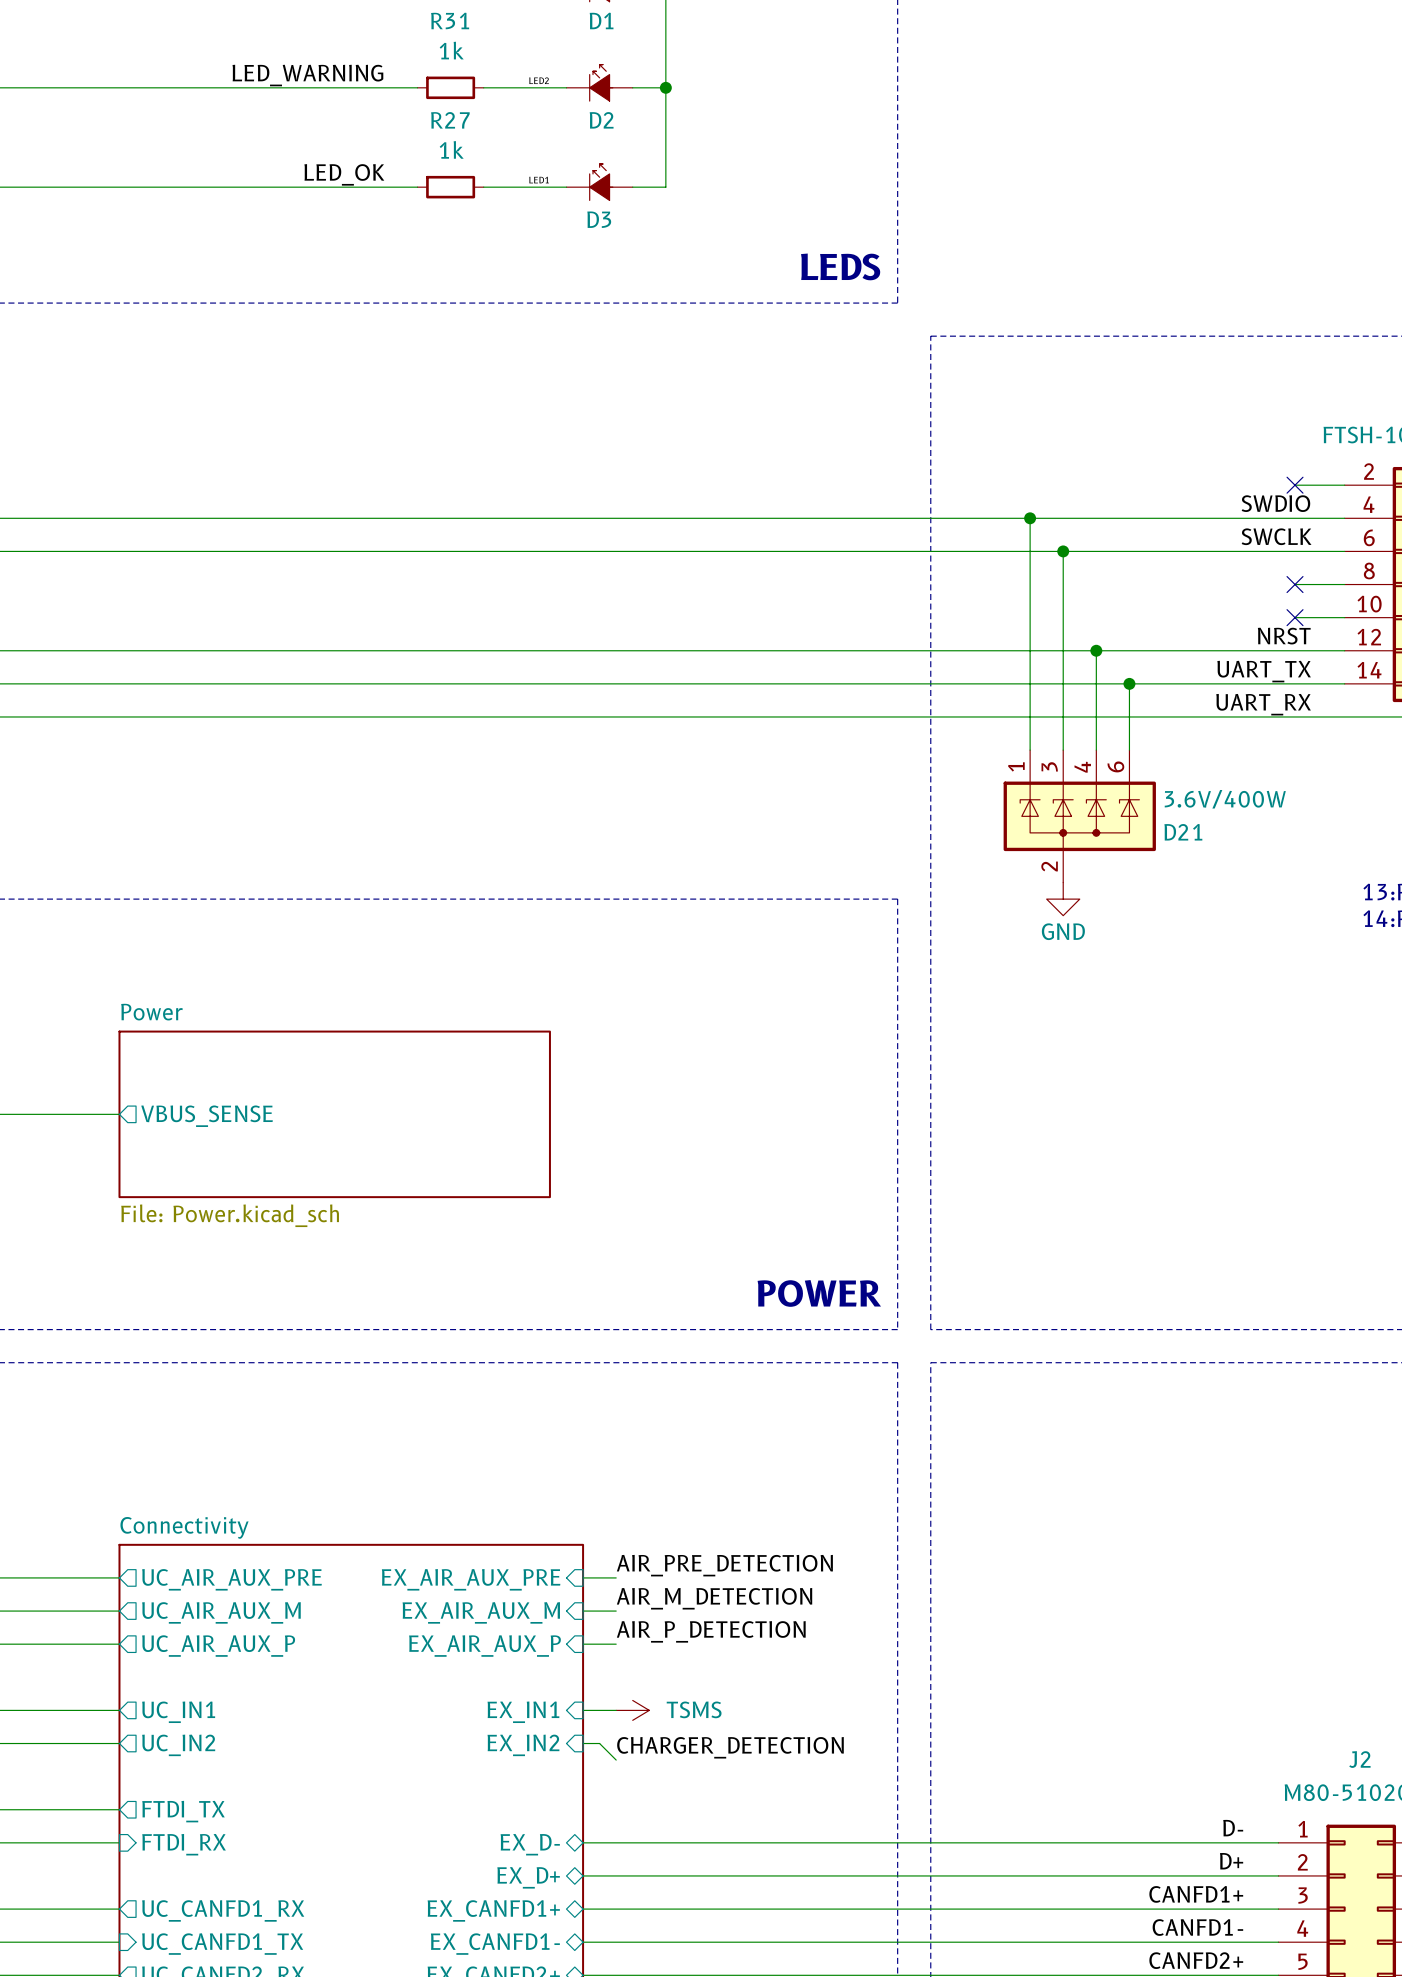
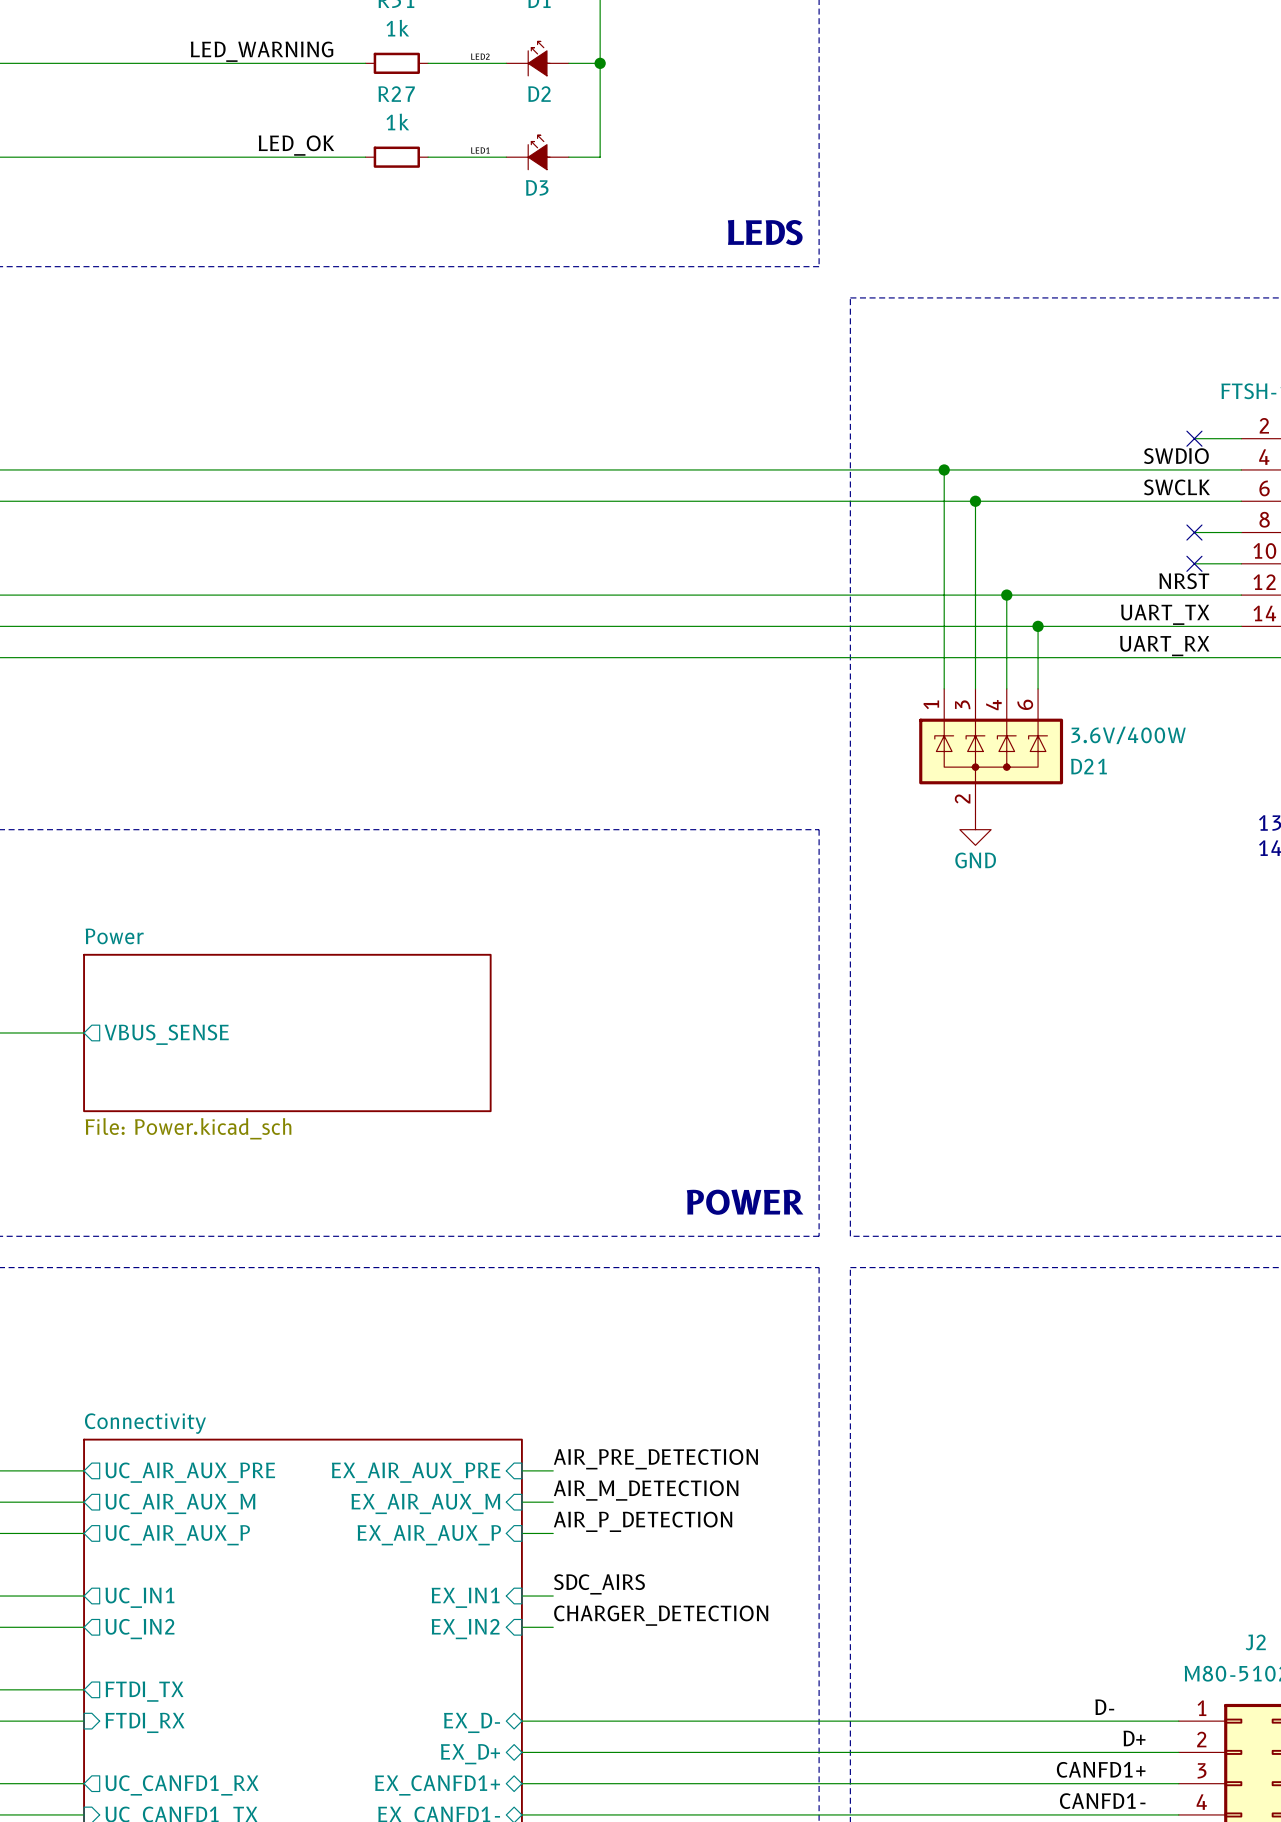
label: none -> SDC_AIRS (599, 1584)
power symbol: TSMS (632, 1710) -> none
wire: (599, 1743) (616, 1760) -> (537, 1627) (553, 1627)
label position: CHARGER_DETECTION (730, 1747) -> CHARGER_DETECTION (661, 1615)
label position: D- (1233, 1828) -> D- (1104, 1707)

